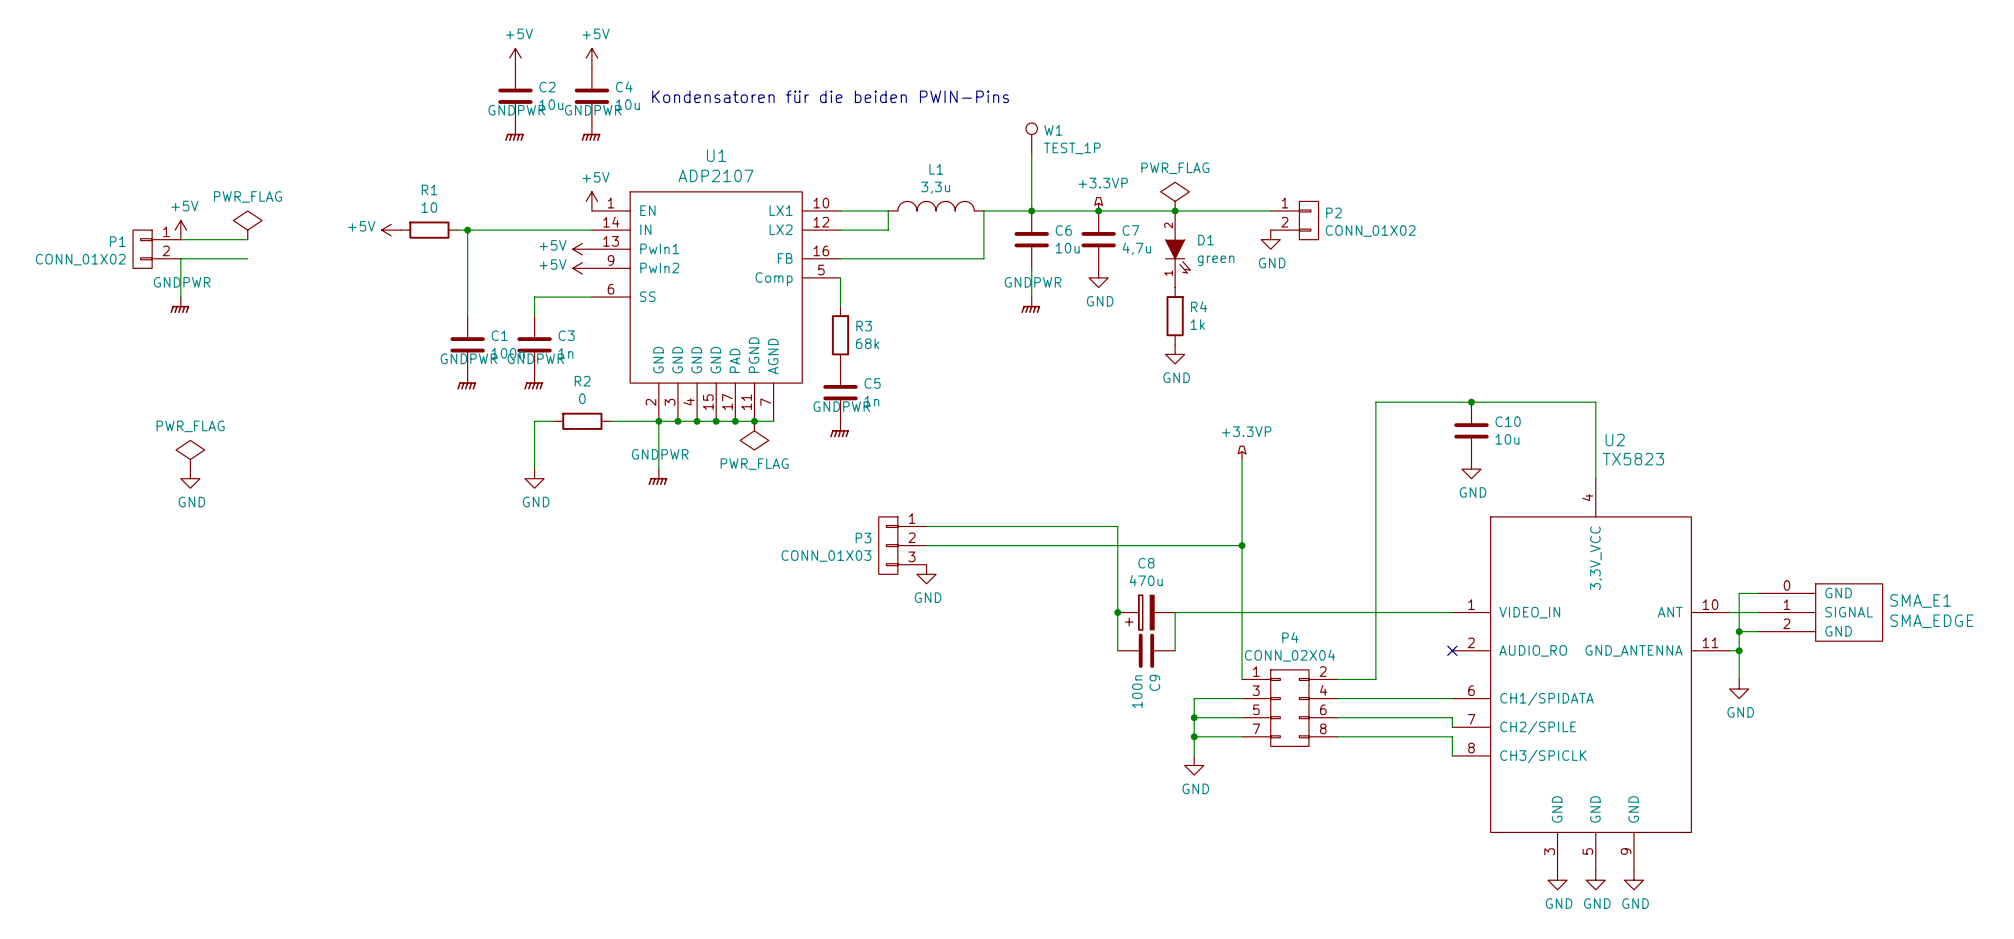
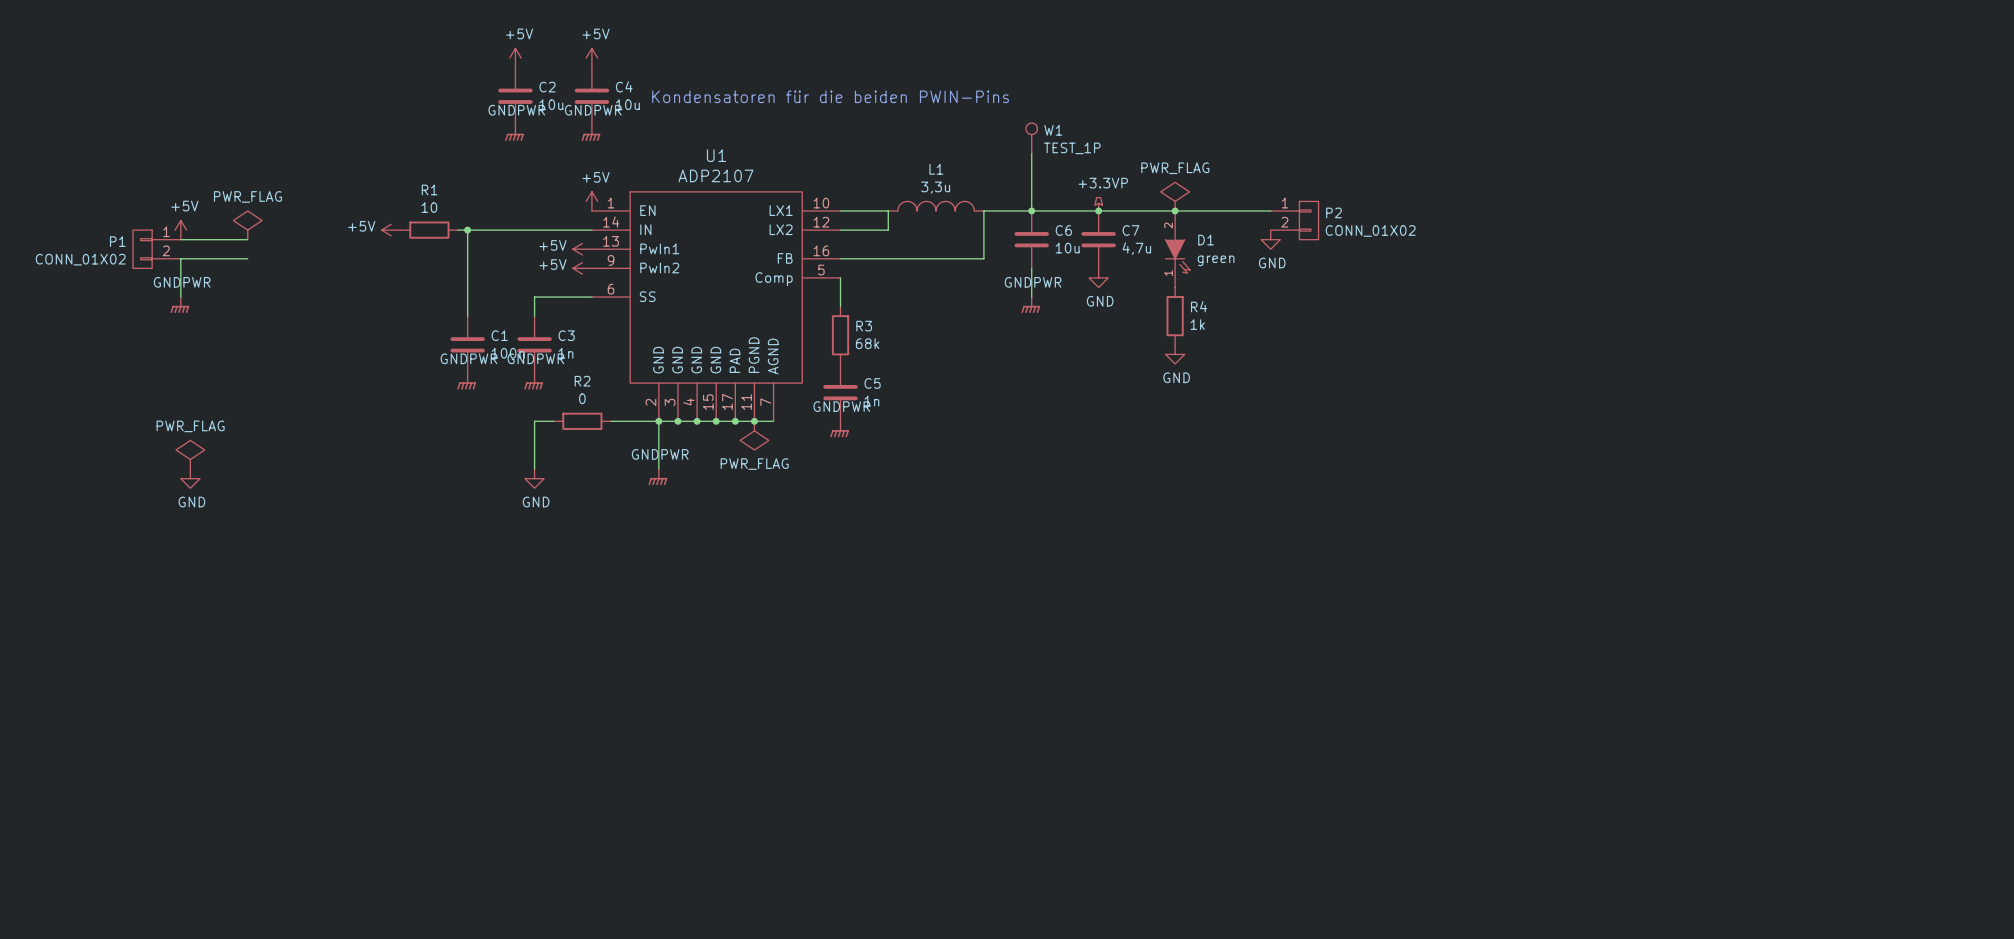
junction: (1471, 402) -> none
C10: 10u (1471, 430) -> none
power symbol: +3.3VP (1242, 452) -> none
wire: (1242, 459) (1242, 679) -> none
power symbol: GND (1471, 469) -> none
wire: (1595, 478) (1595, 402) (1375, 402) (1375, 679) (1337, 679) -> none
wire: (926, 526) (1117, 526) (1117, 650) -> none
P3: CONN_01X03 (902, 545) -> none
wire: (926, 545) (1242, 545) -> none
junction: (1242, 545) -> none
power symbol: GND (926, 574) -> none
wire: (1758, 593) (1739, 593) (1739, 679) -> none
junction: (1117, 612) -> none
C8: 470u (1146, 612) -> none
wire: (1452, 612) (1175, 612) (1175, 650) -> none
wire: (1729, 612) (1758, 612) -> none
SMA_E1: SMA_EDGE (1820, 612) -> none
wire: (1739, 631) (1758, 631) -> none
junction: (1739, 631) -> none
C9: 100n (1146, 650) -> none
no-connect mark: (1452, 650) -> none
wire: (1729, 650) (1739, 650) -> none
junction: (1739, 650) -> none
U2: TX5823 (1591, 674) -> none
power symbol: GND (1739, 689) -> none
wire: (1242, 698) (1194, 698) (1194, 755) -> none
wire: (1337, 698) (1452, 698) -> none
P4: CONN_02X04 (1289, 708) -> none
wire: (1194, 717) (1242, 717) -> none
junction: (1194, 717) -> none
wire: (1337, 717) (1452, 717) (1452, 727) -> none
wire: (1194, 736) (1242, 736) -> none
junction: (1194, 736) -> none
wire: (1337, 736) (1452, 736) (1452, 755) -> none
power symbol: GND (1194, 765) -> none
power symbol: GND (1557, 880) -> none
power symbol: GND (1595, 880) -> none
power symbol: GND (1634, 880) -> none

